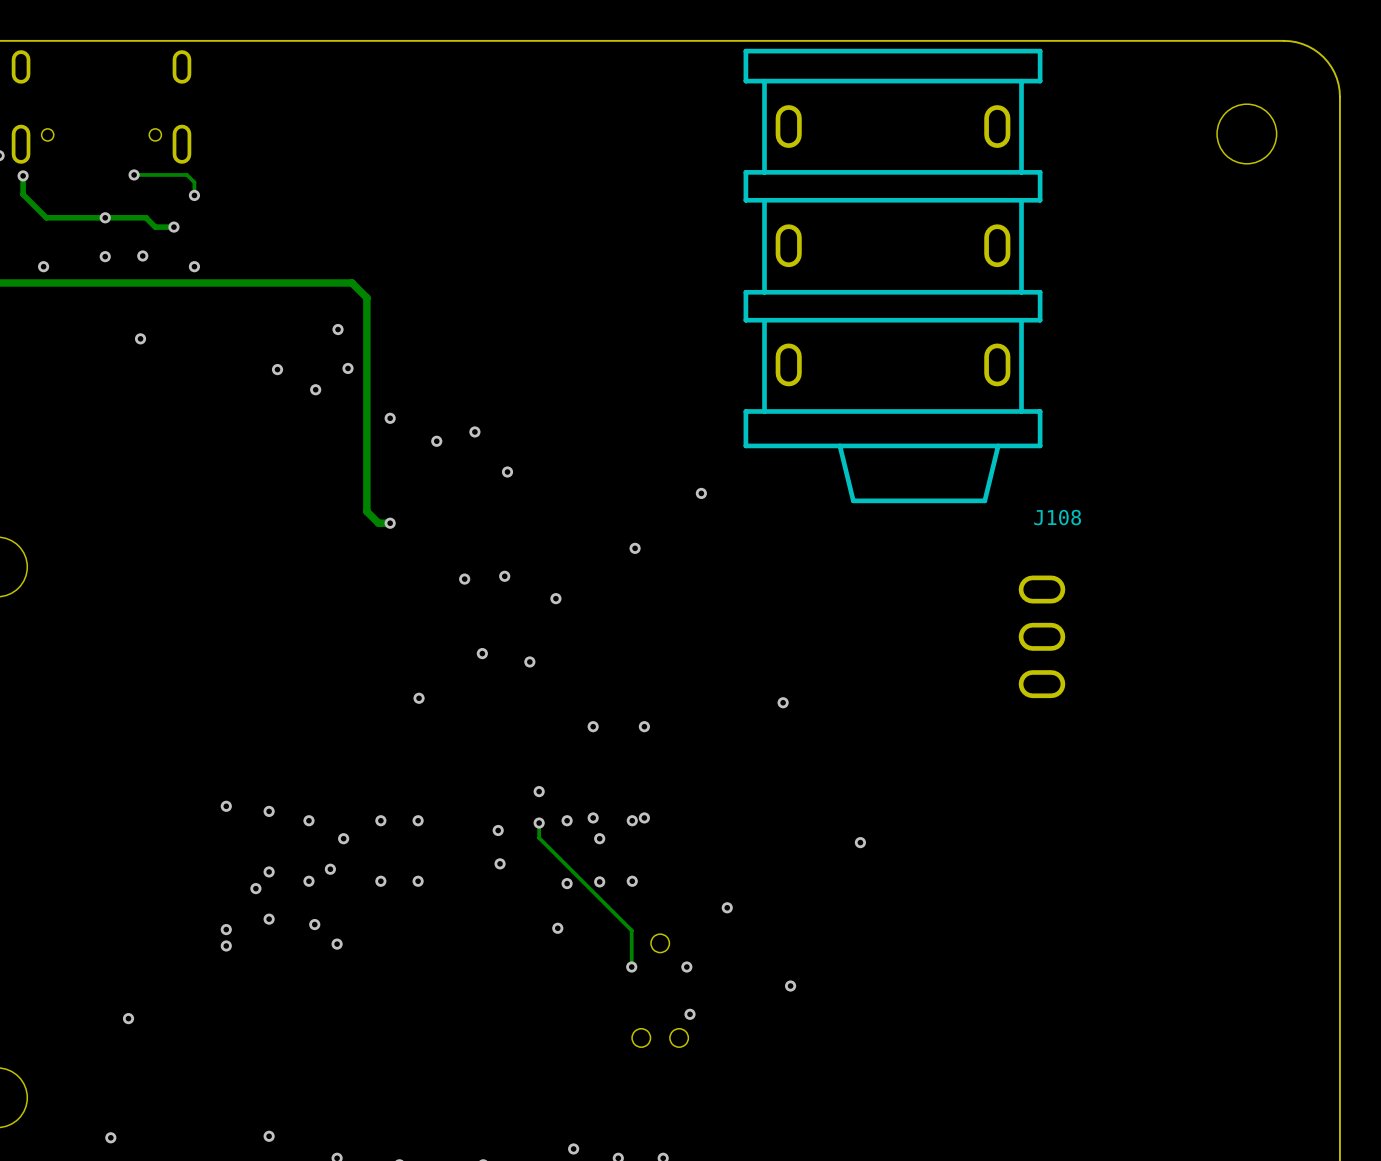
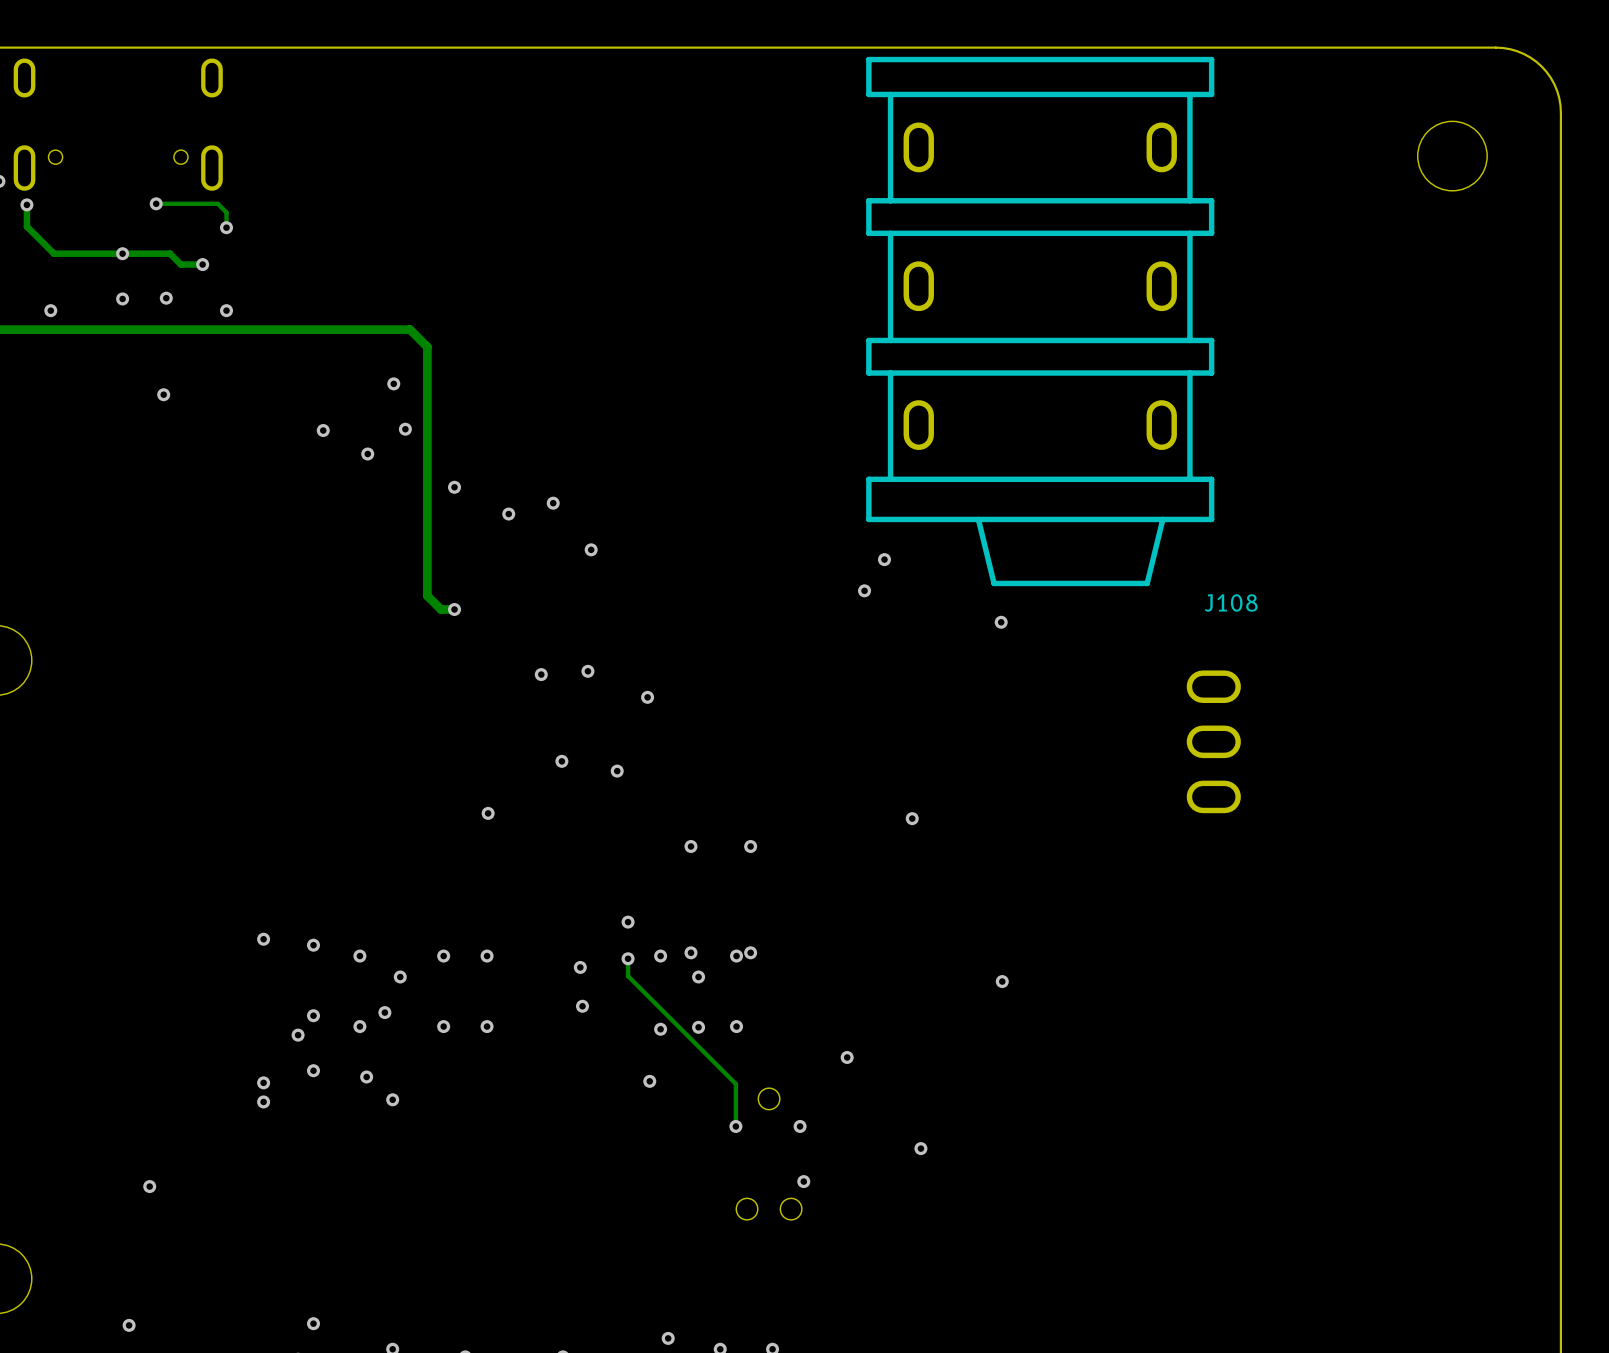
via: none -> (884, 559)
via: (701, 493) -> none
via: none -> (864, 590)
via: none -> (1001, 622)
via: (635, 548) -> none

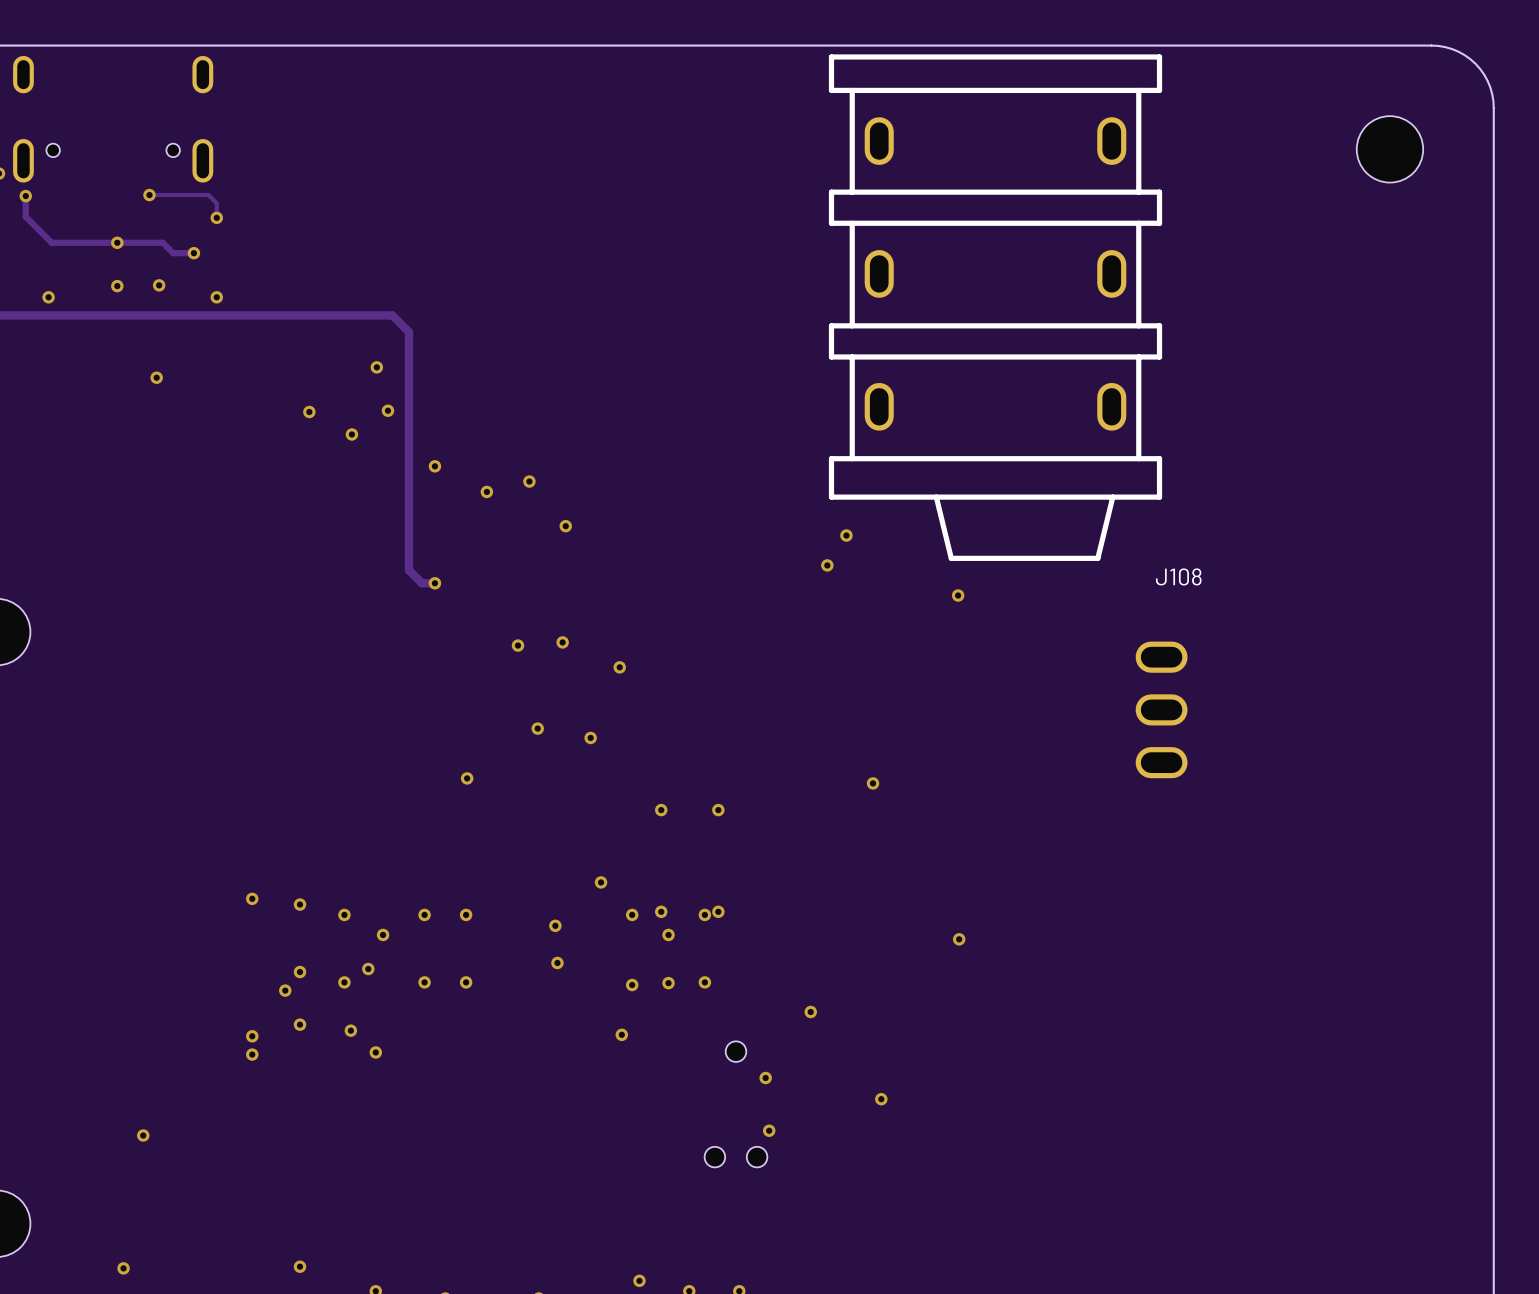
track: (628, 958) (628, 976) (735, 1083) (735, 1126) -> none
via: (628, 958) -> none
via: (735, 1126) -> none

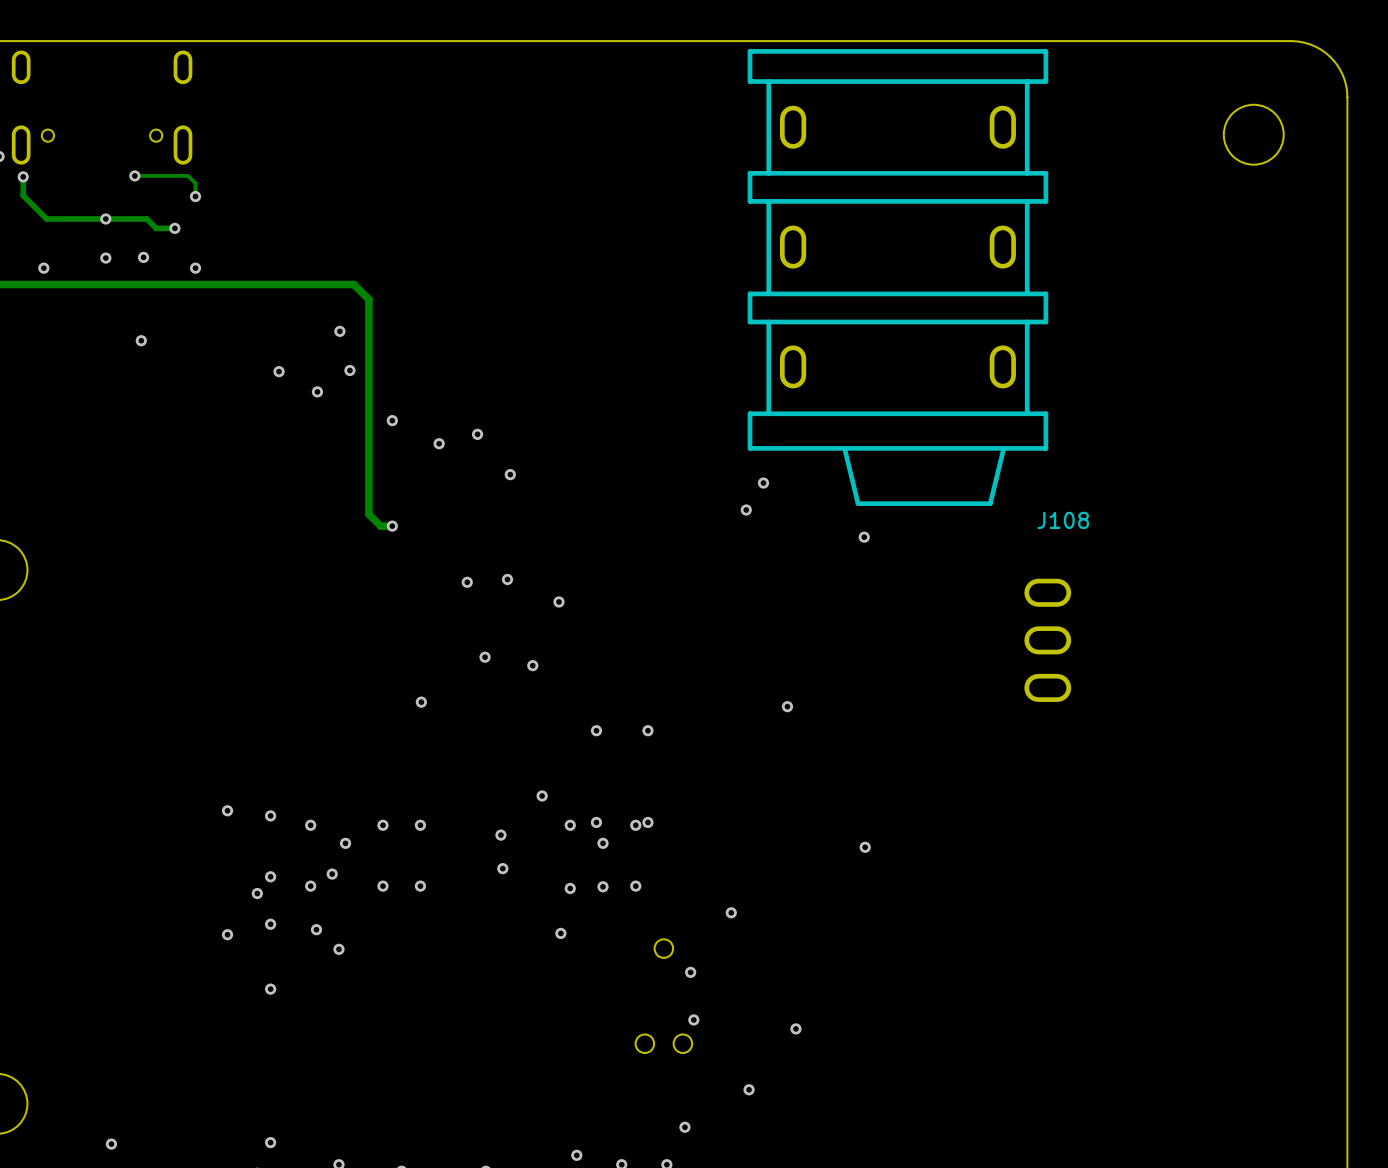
via position: (252, 1054) -> (270, 989)
via position: (881, 1099) -> (795, 1028)
via: (143, 1135) -> none
via: none -> (749, 1089)
via: none -> (684, 1127)

